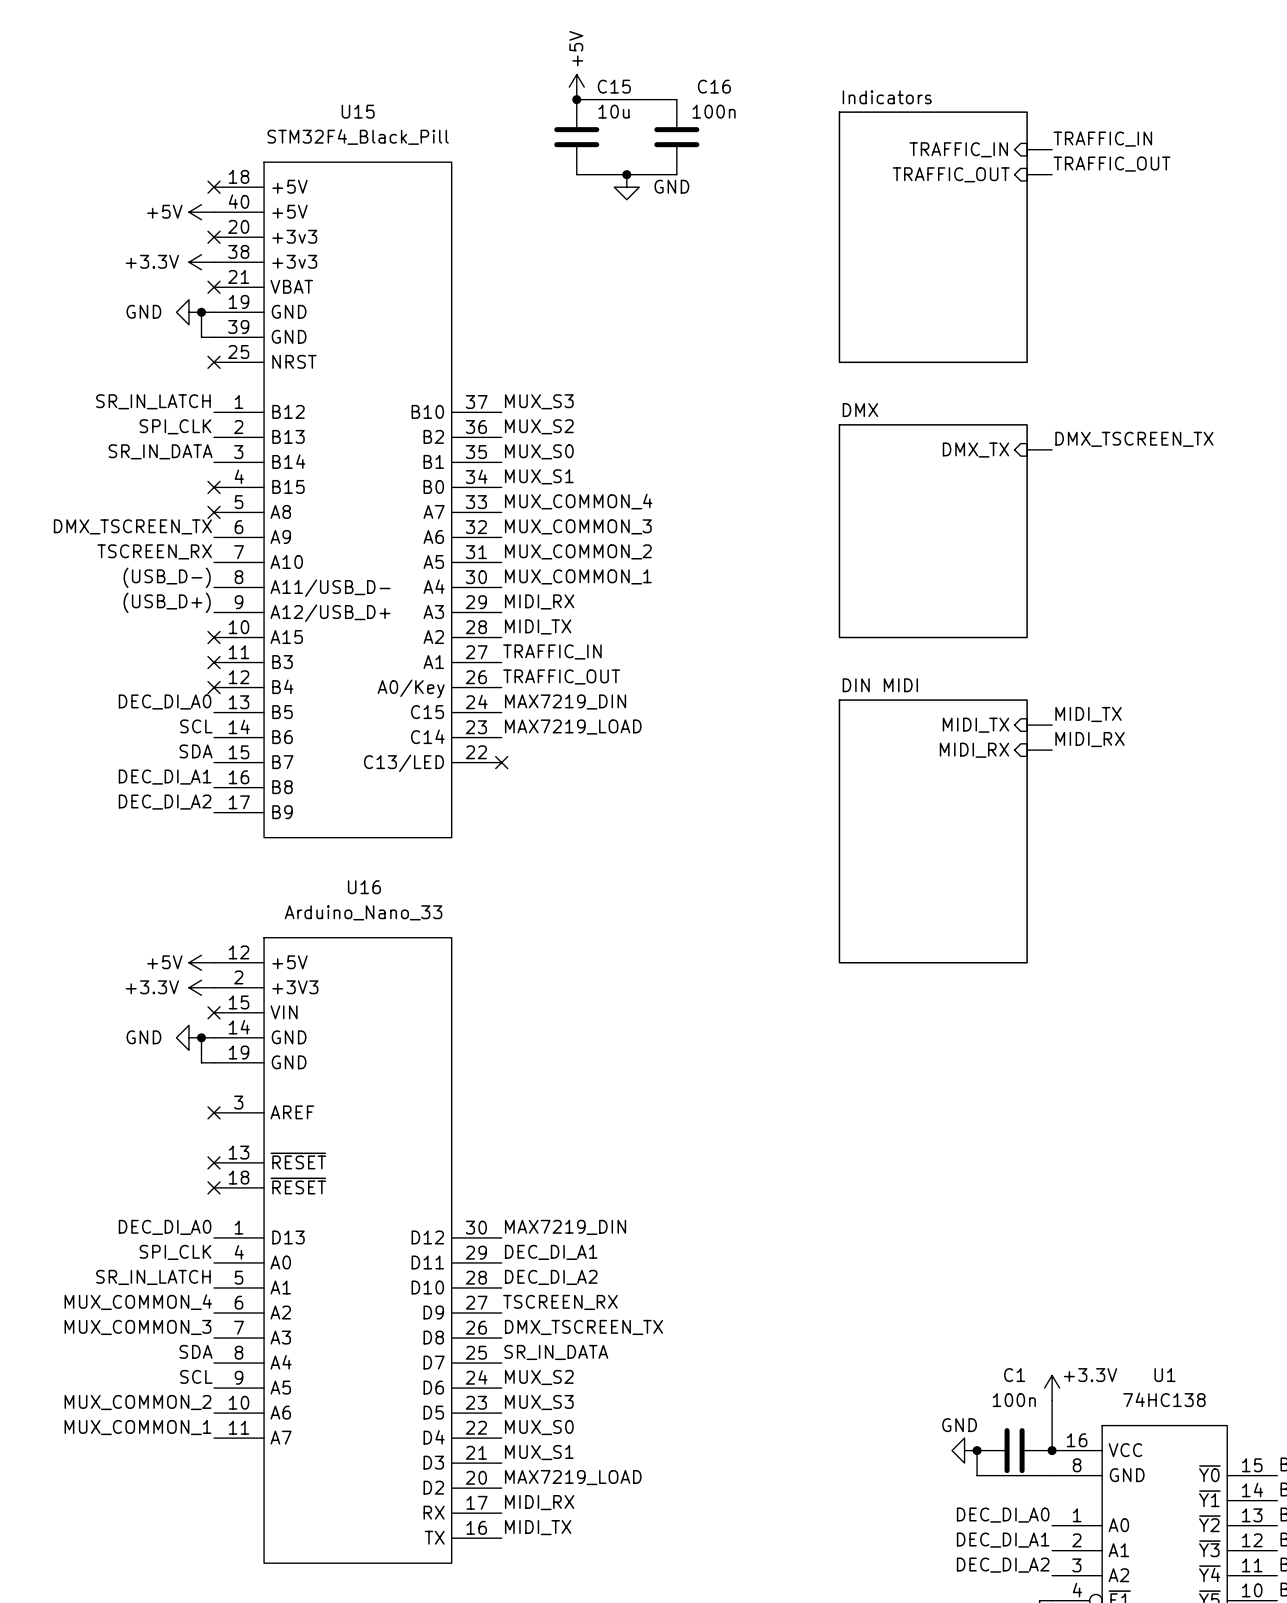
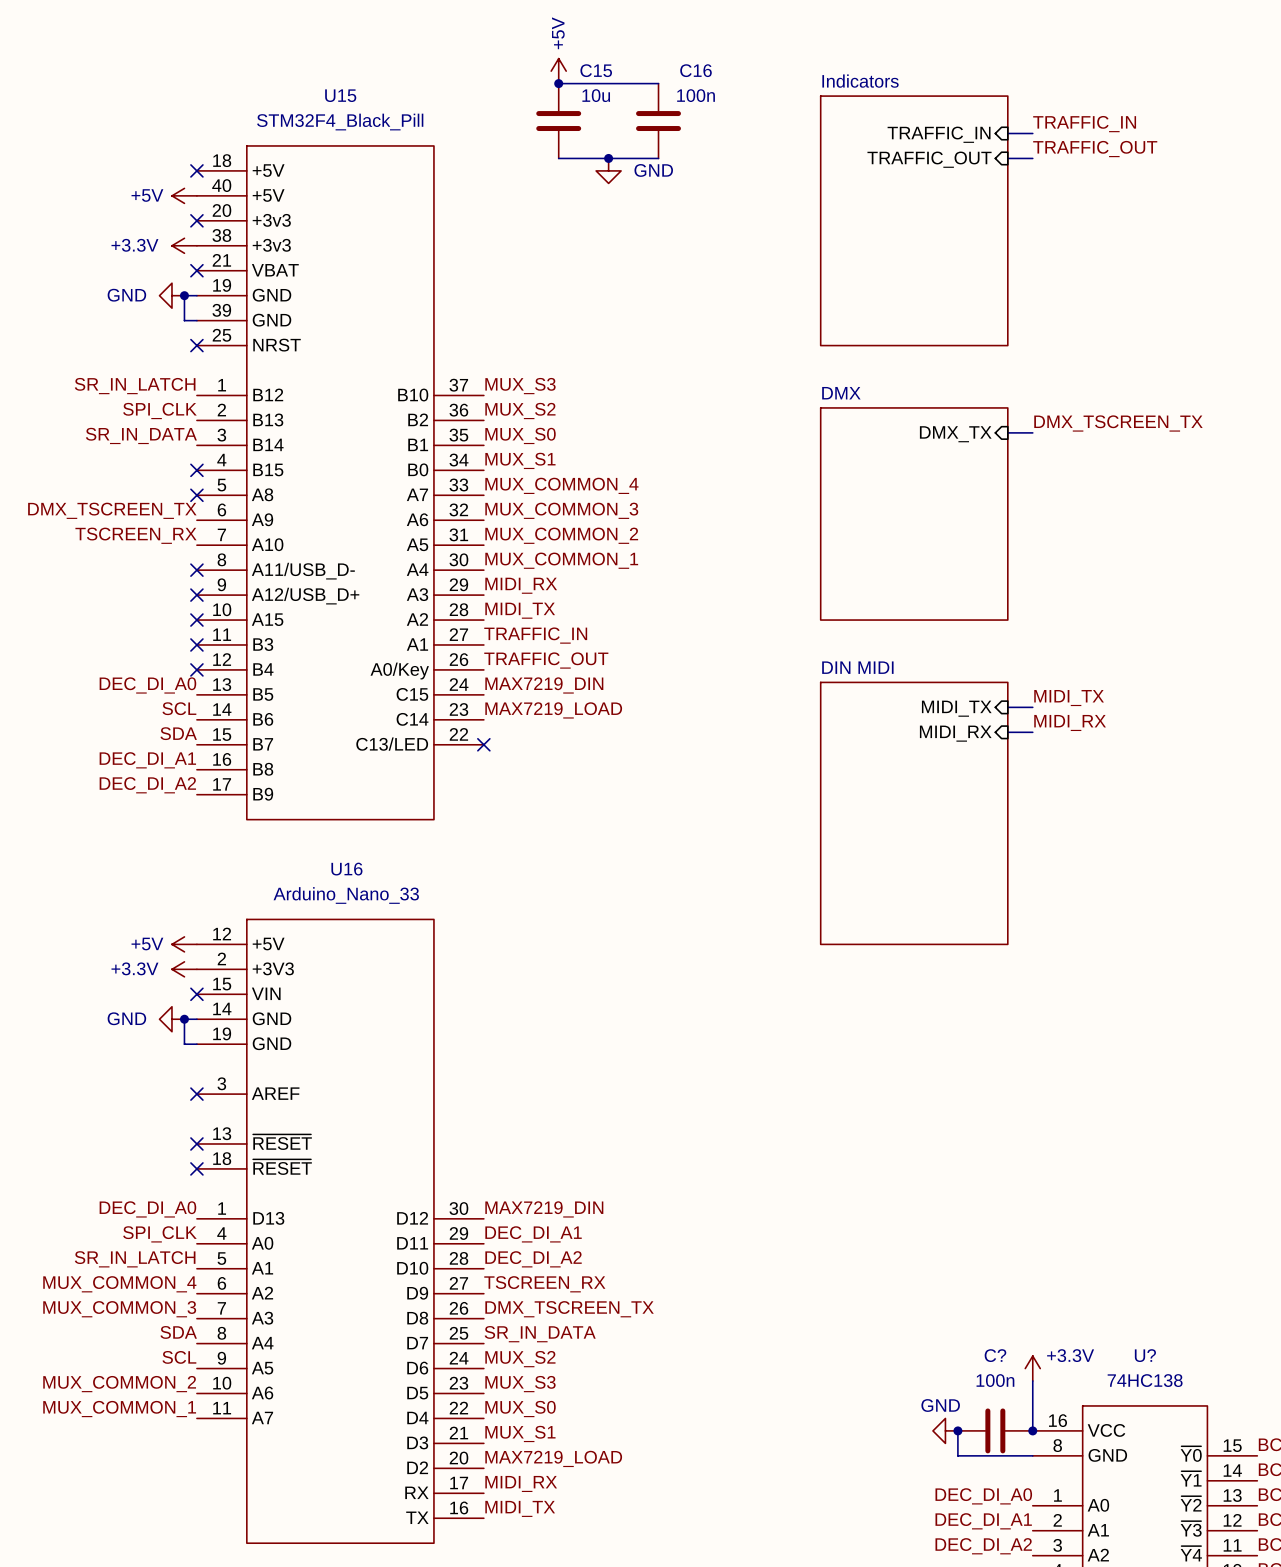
label: (USB_D-) (167, 577) -> none
no-connect mark: none -> (196, 570)
label: (USB_D+) (167, 602) -> none
no-connect mark: none -> (196, 595)
C1 name: C1 (1014, 1375) -> C? (995, 1355)
U1 name: U1 (1164, 1375) -> U? (1145, 1355)

